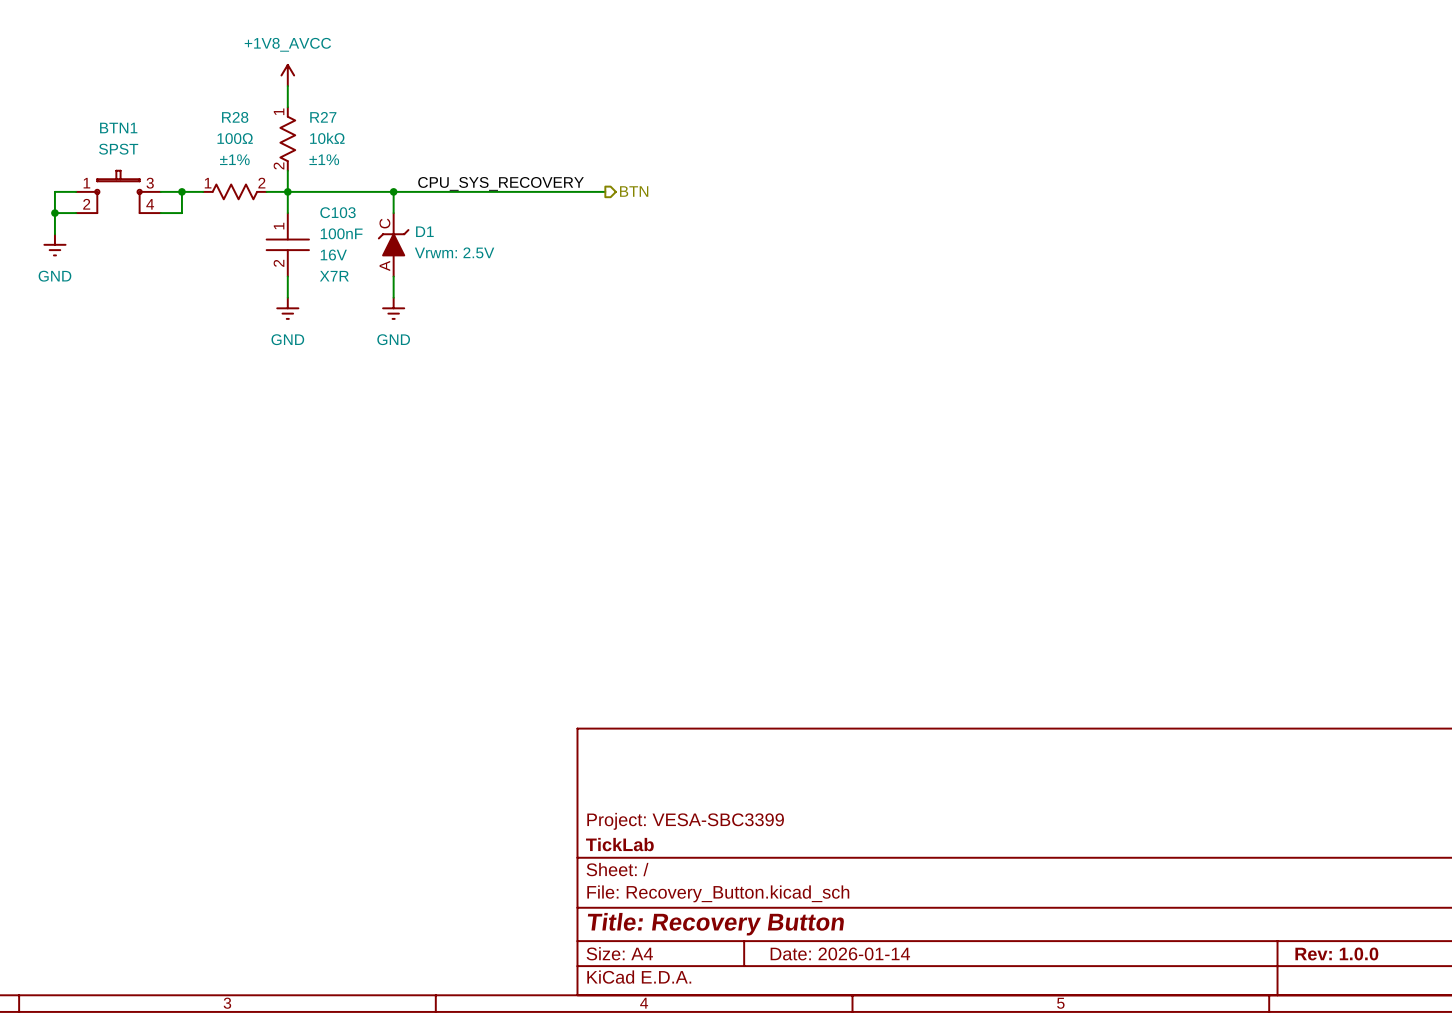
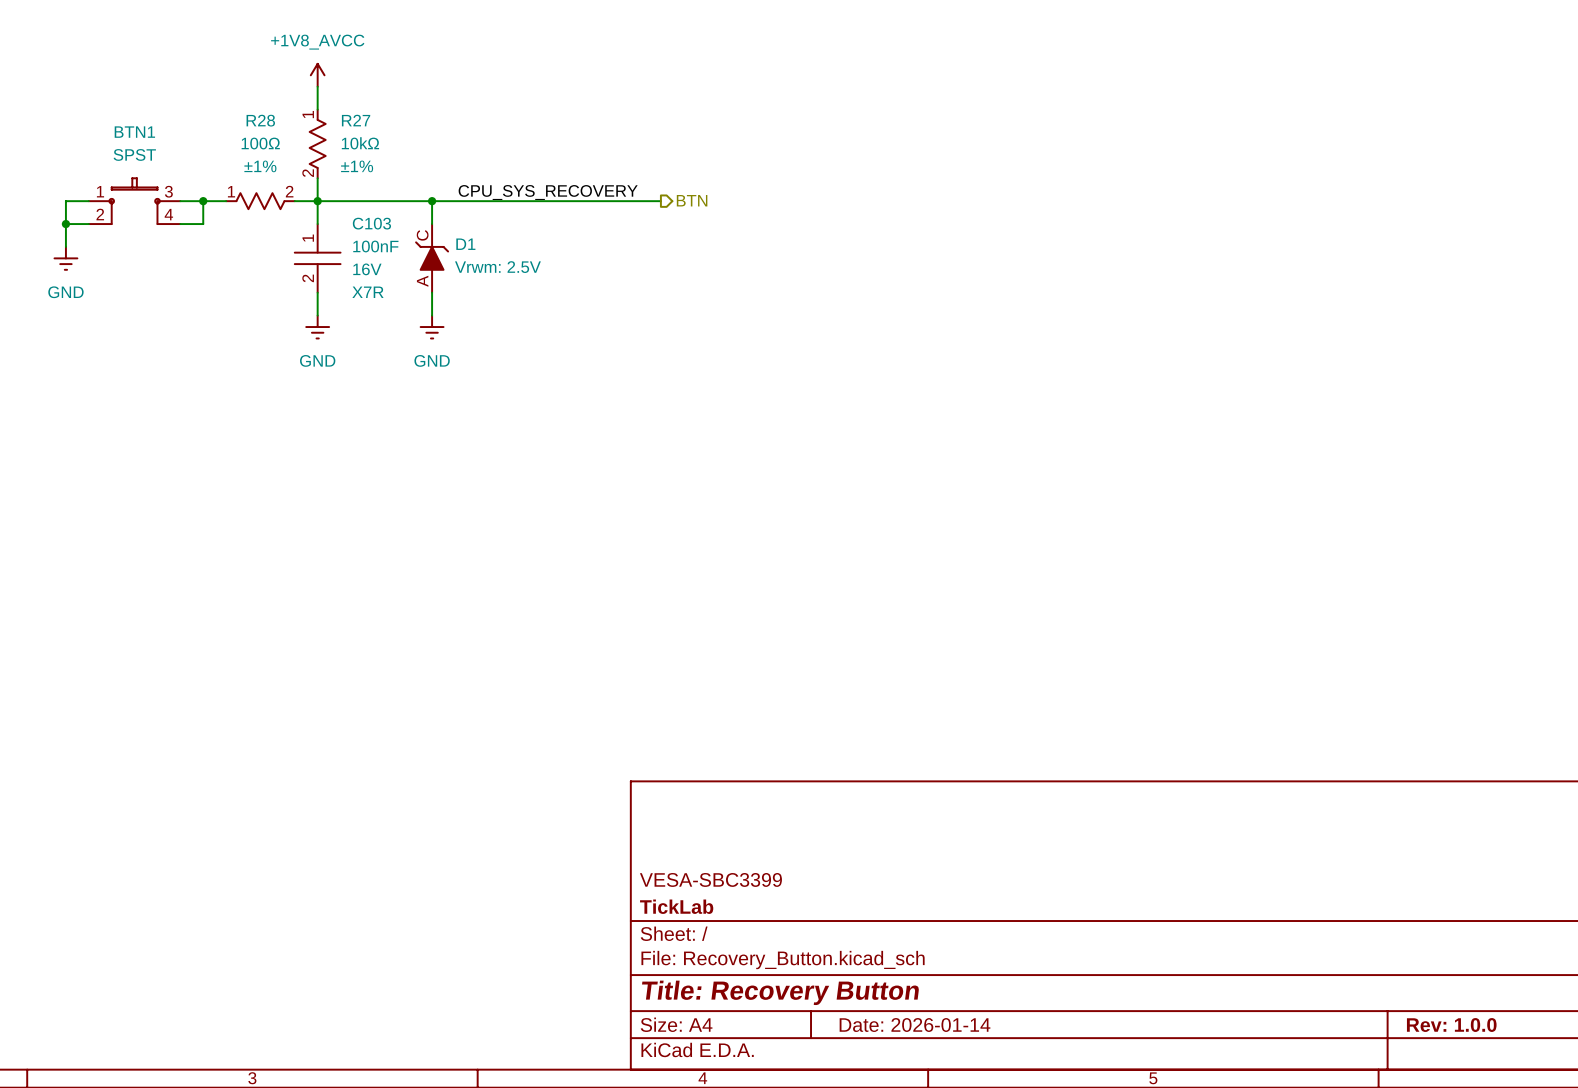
D1 flip: as is (393, 242) -> left-right (432, 256)
title block: Project: VESA-SBC3399 (685, 821) -> VESA-SBC3399 (710, 879)

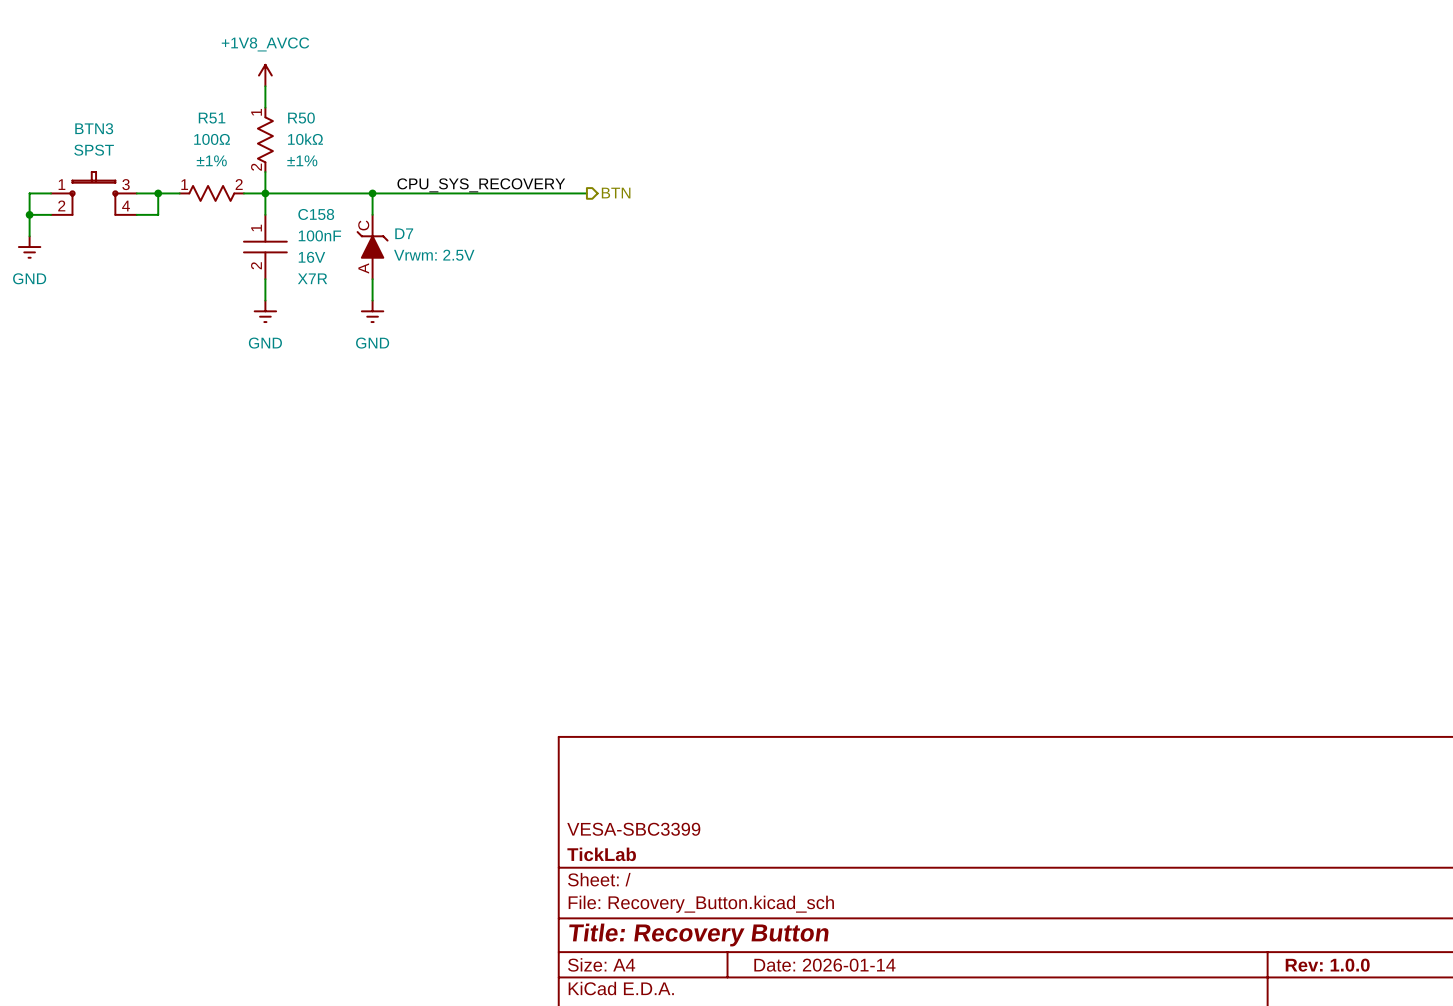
R28 name: R28 (260, 120) -> R51 (212, 118)
R27 name: R27 (356, 120) -> R50 (301, 118)
BTN1 name: BTN1 (134, 132) -> BTN3 (94, 128)
C103 name: C103 (371, 223) -> C158 (316, 214)
D1 name: D1 (465, 244) -> D7 (404, 233)

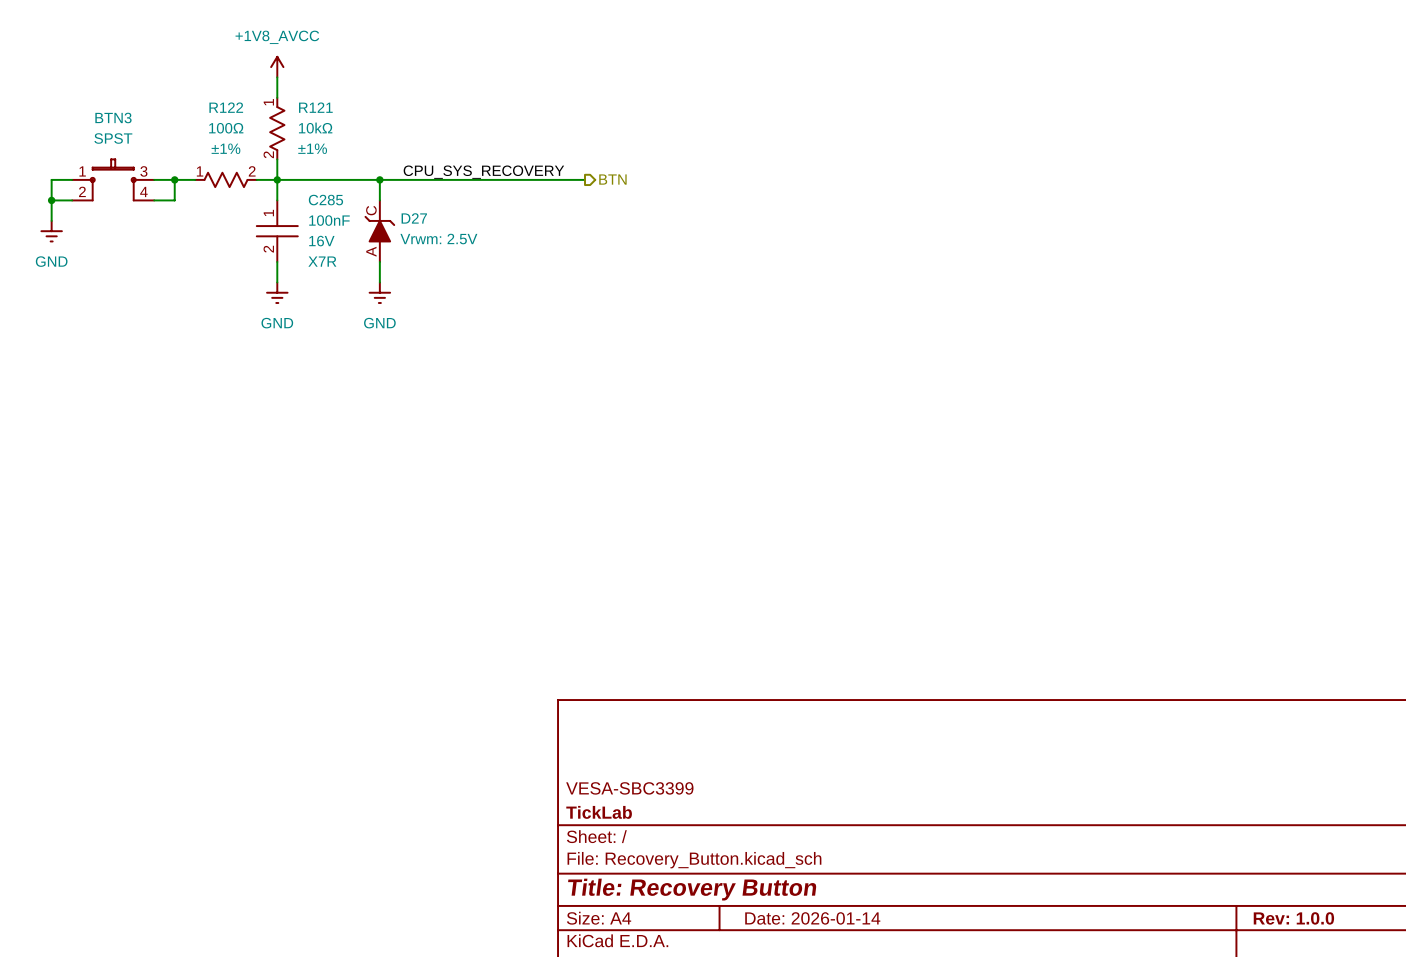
R51 name: R51 (212, 118) -> R122 (226, 107)
R50 name: R50 (301, 118) -> R121 (315, 107)
C158 name: C158 (316, 214) -> C285 (325, 200)
D7 name: D7 (404, 233) -> D27 (414, 218)

